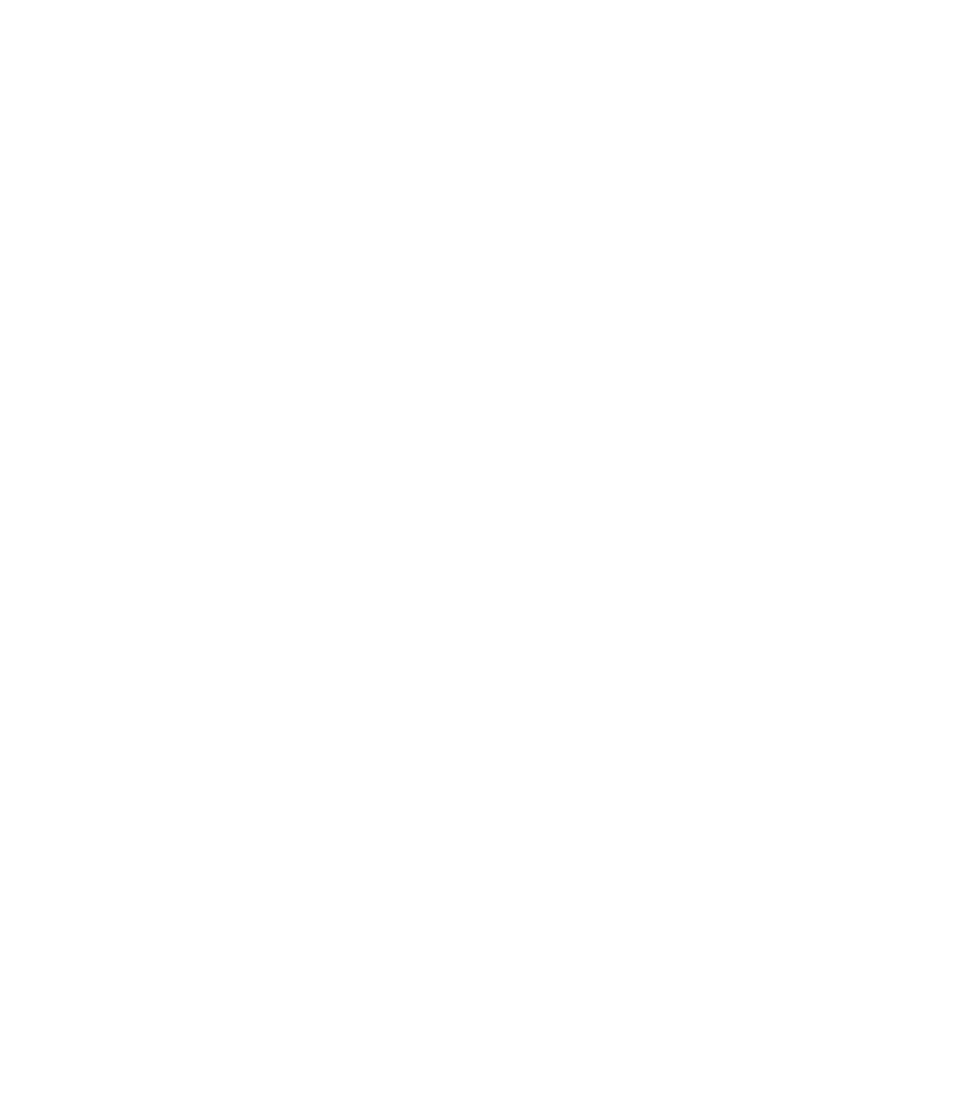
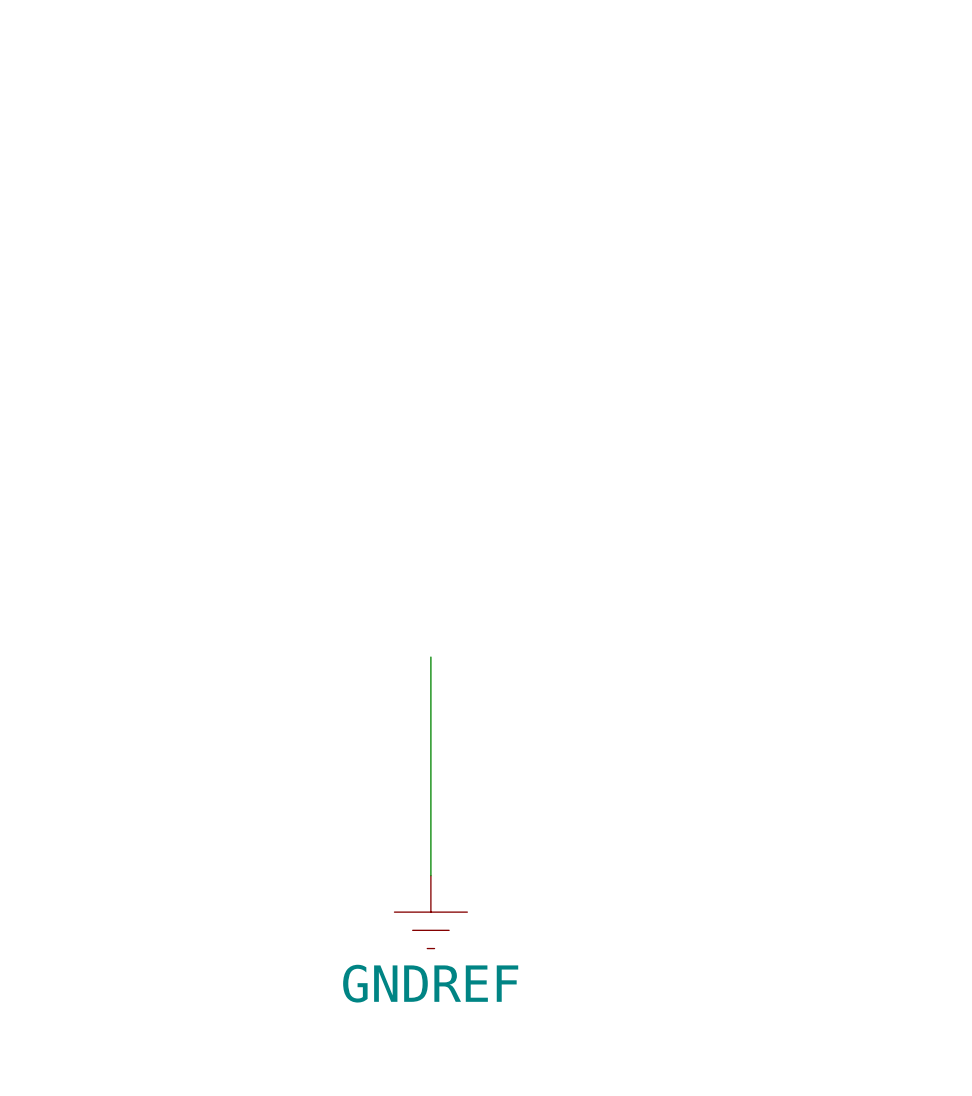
wire: none -> (430, 657) (430, 875)
power symbol: none -> GNDREF (430, 912)

